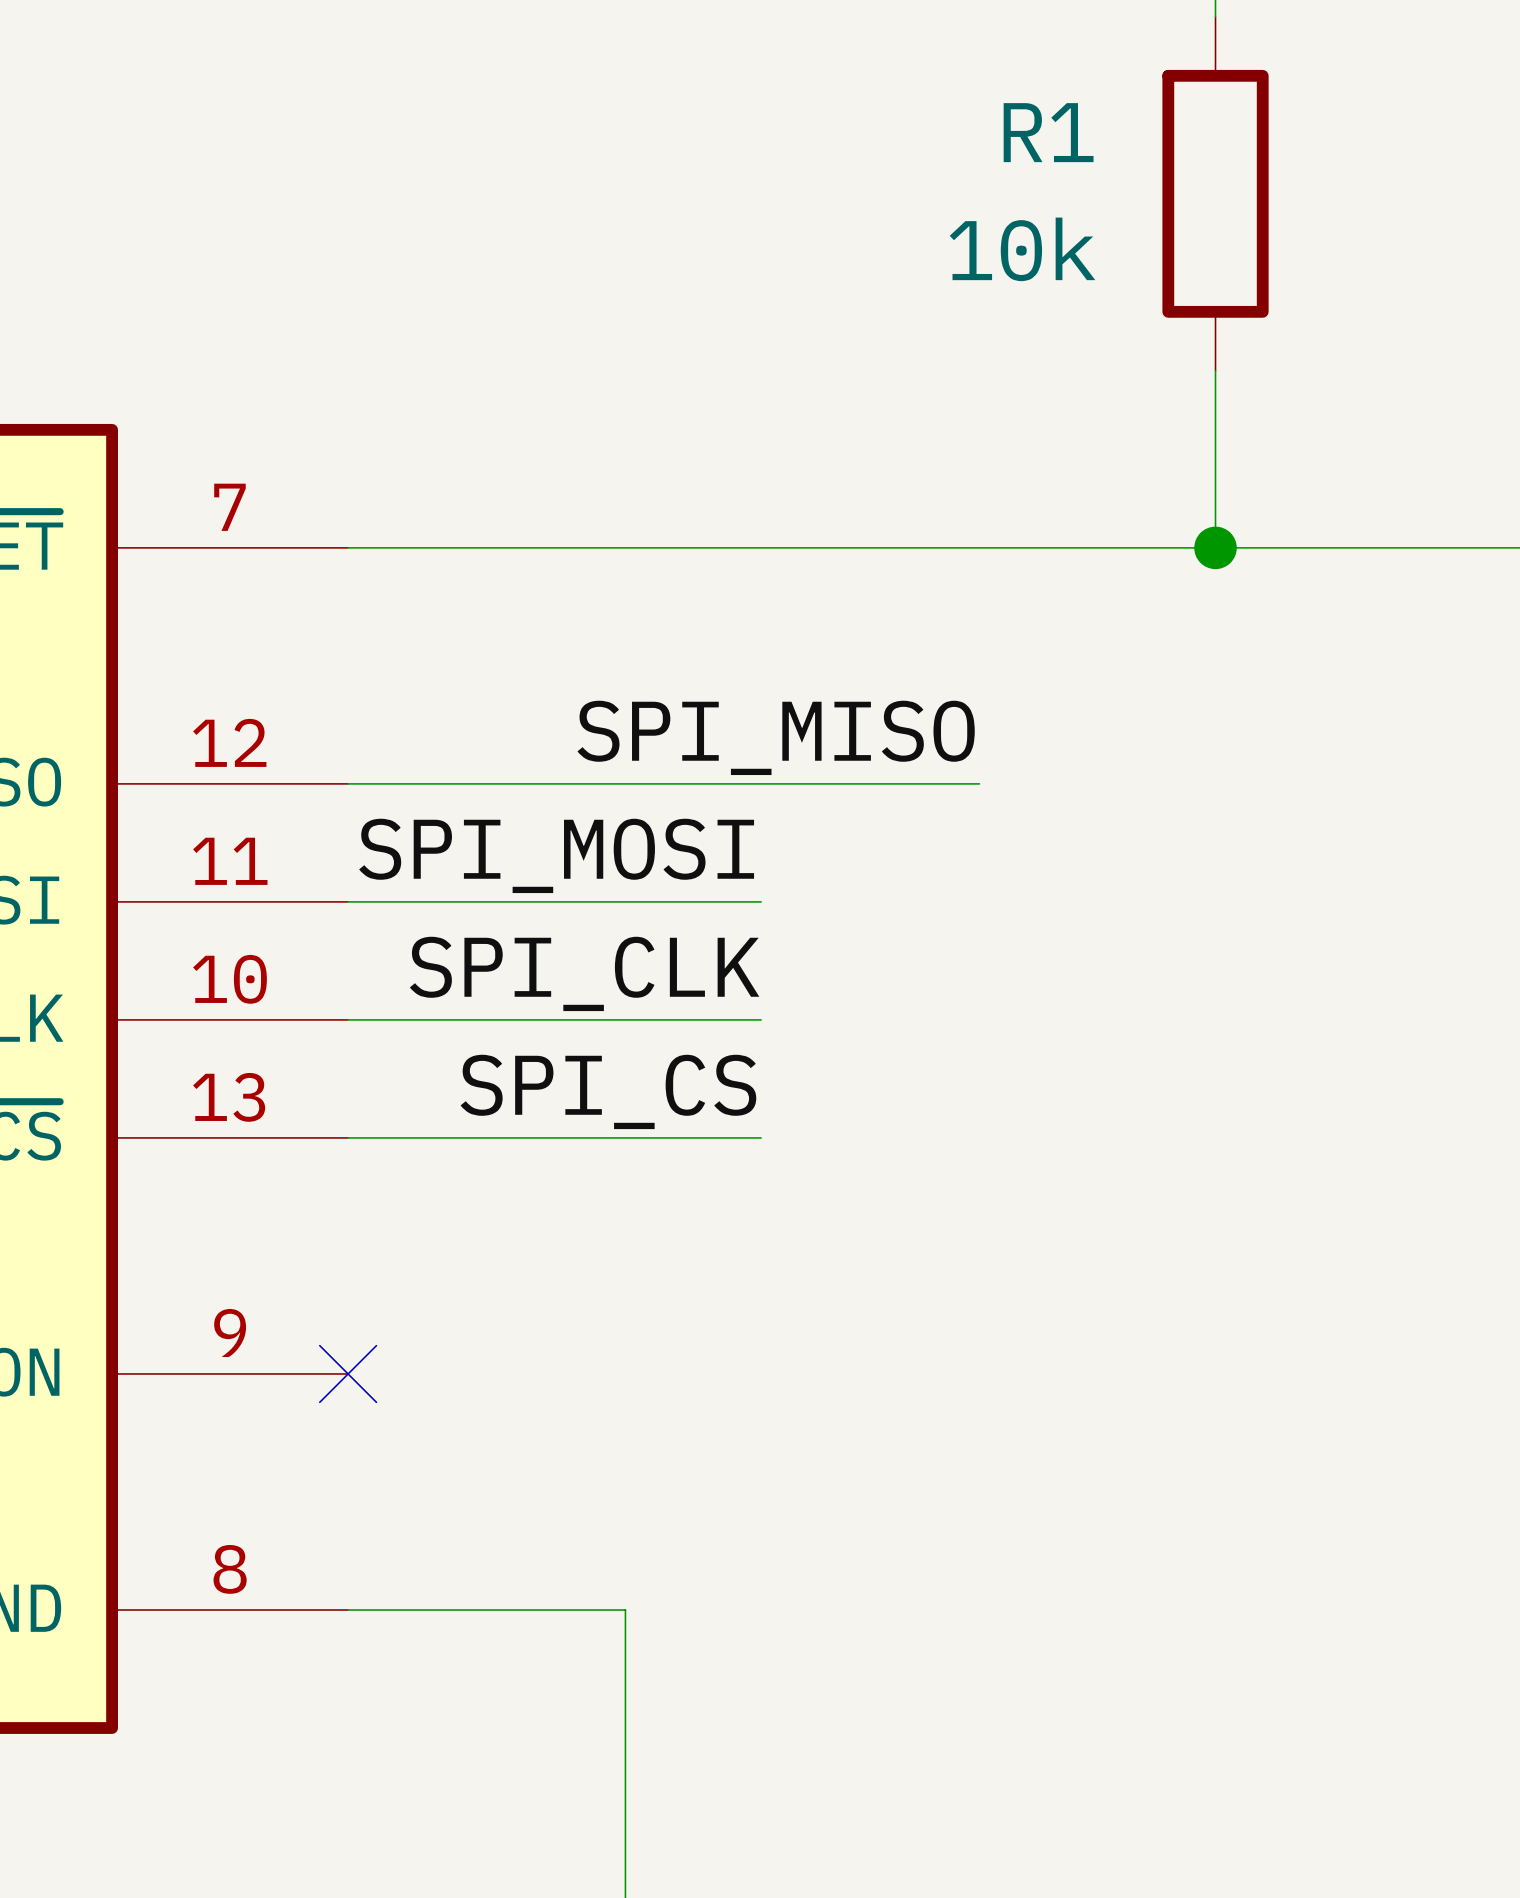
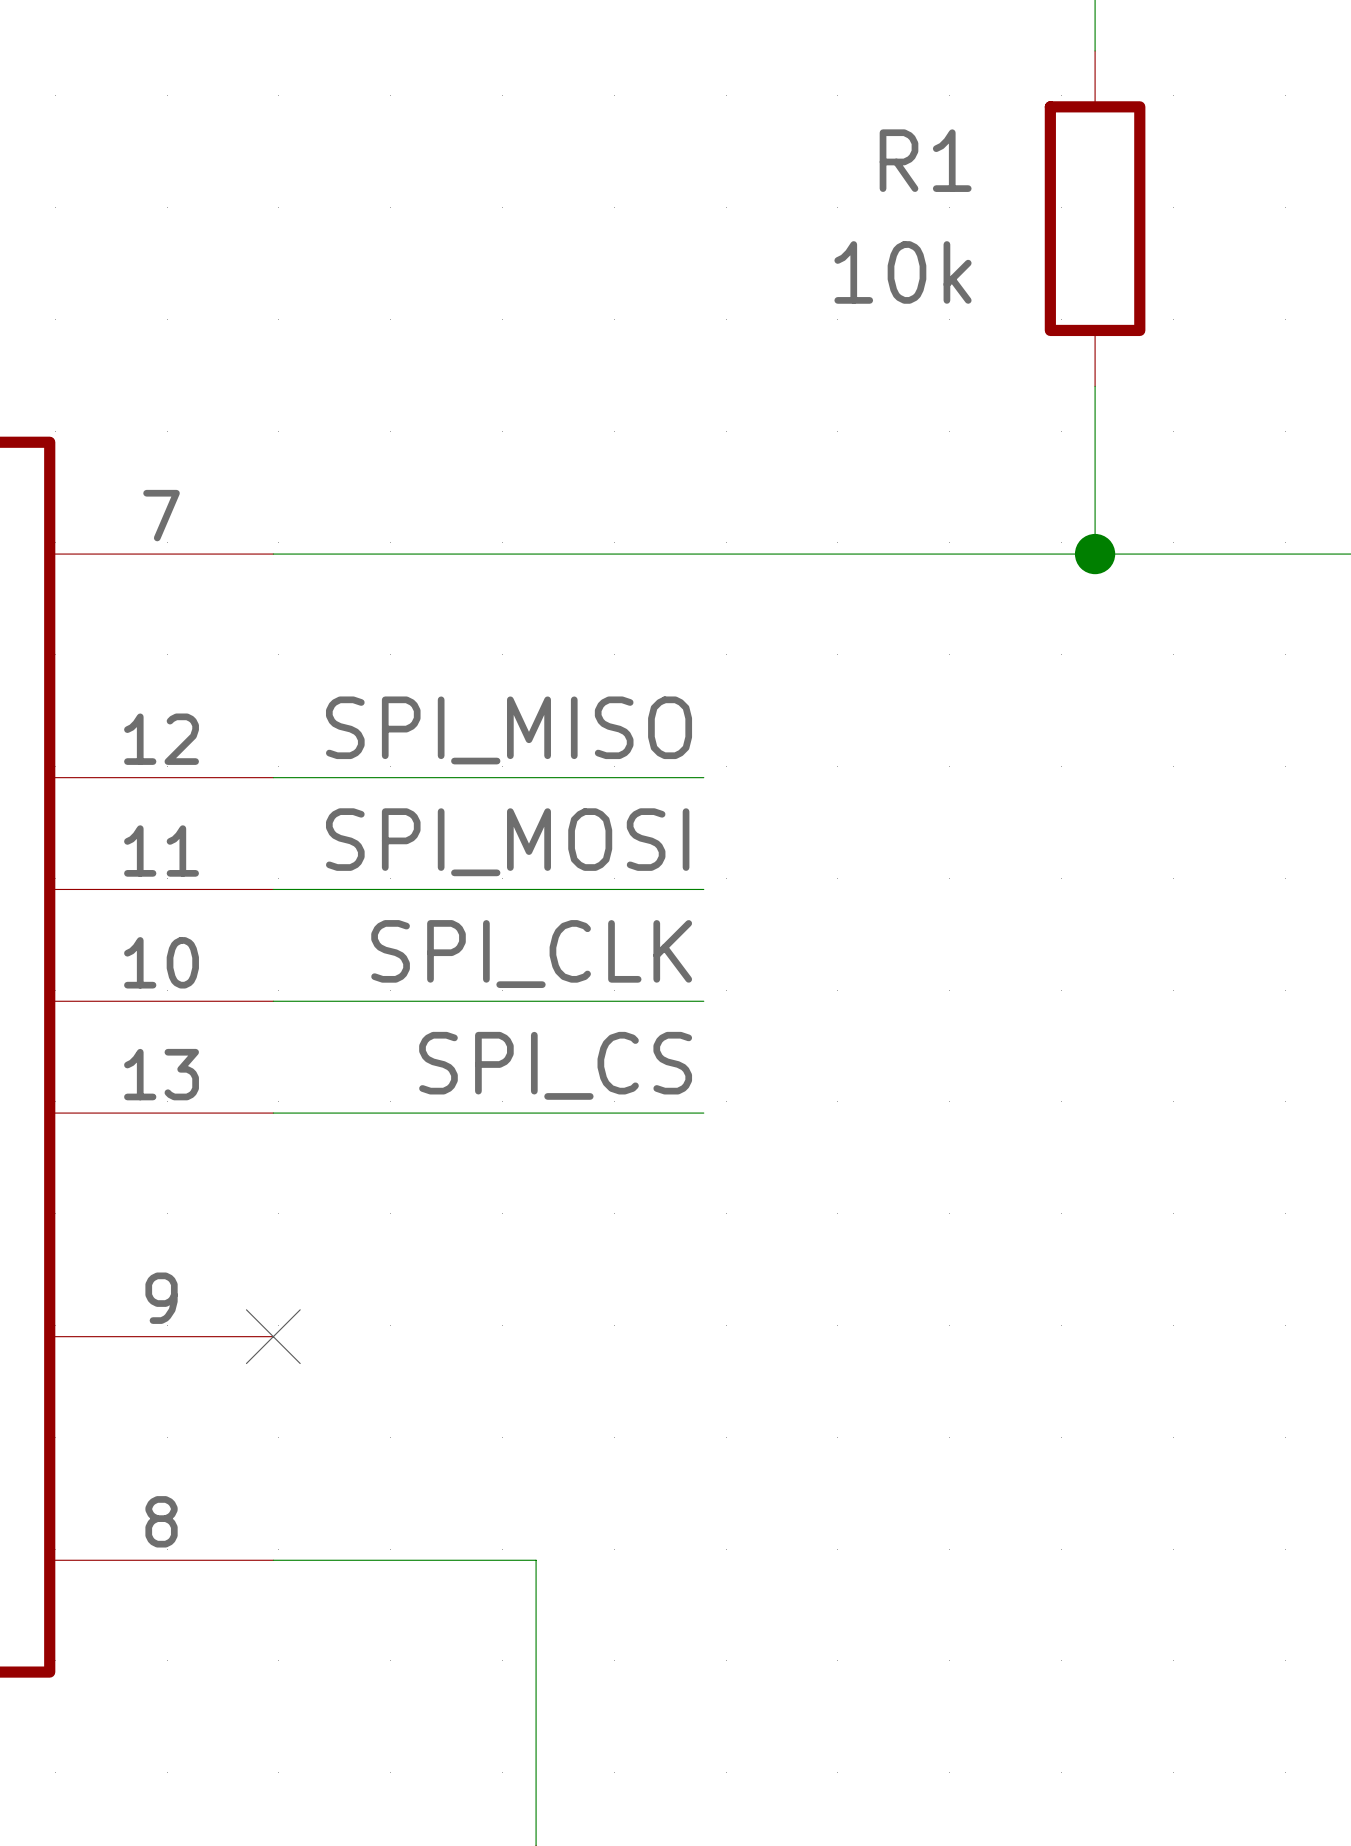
label position: SPI_MISO (776, 737) -> SPI_MISO (509, 730)
wire: (802, 783) (979, 783) -> none
label position: SPI_MOSI (556, 855) -> SPI_MOSI (507, 842)
wire: none -> (664, 889) (703, 889)
label position: SPI_CLK (584, 973) -> SPI_CLK (531, 954)
wire: none -> (664, 1001) (703, 1001)
label position: SPI_CS (608, 1091) -> SPI_CS (555, 1065)
wire: none -> (664, 1113) (703, 1113)

